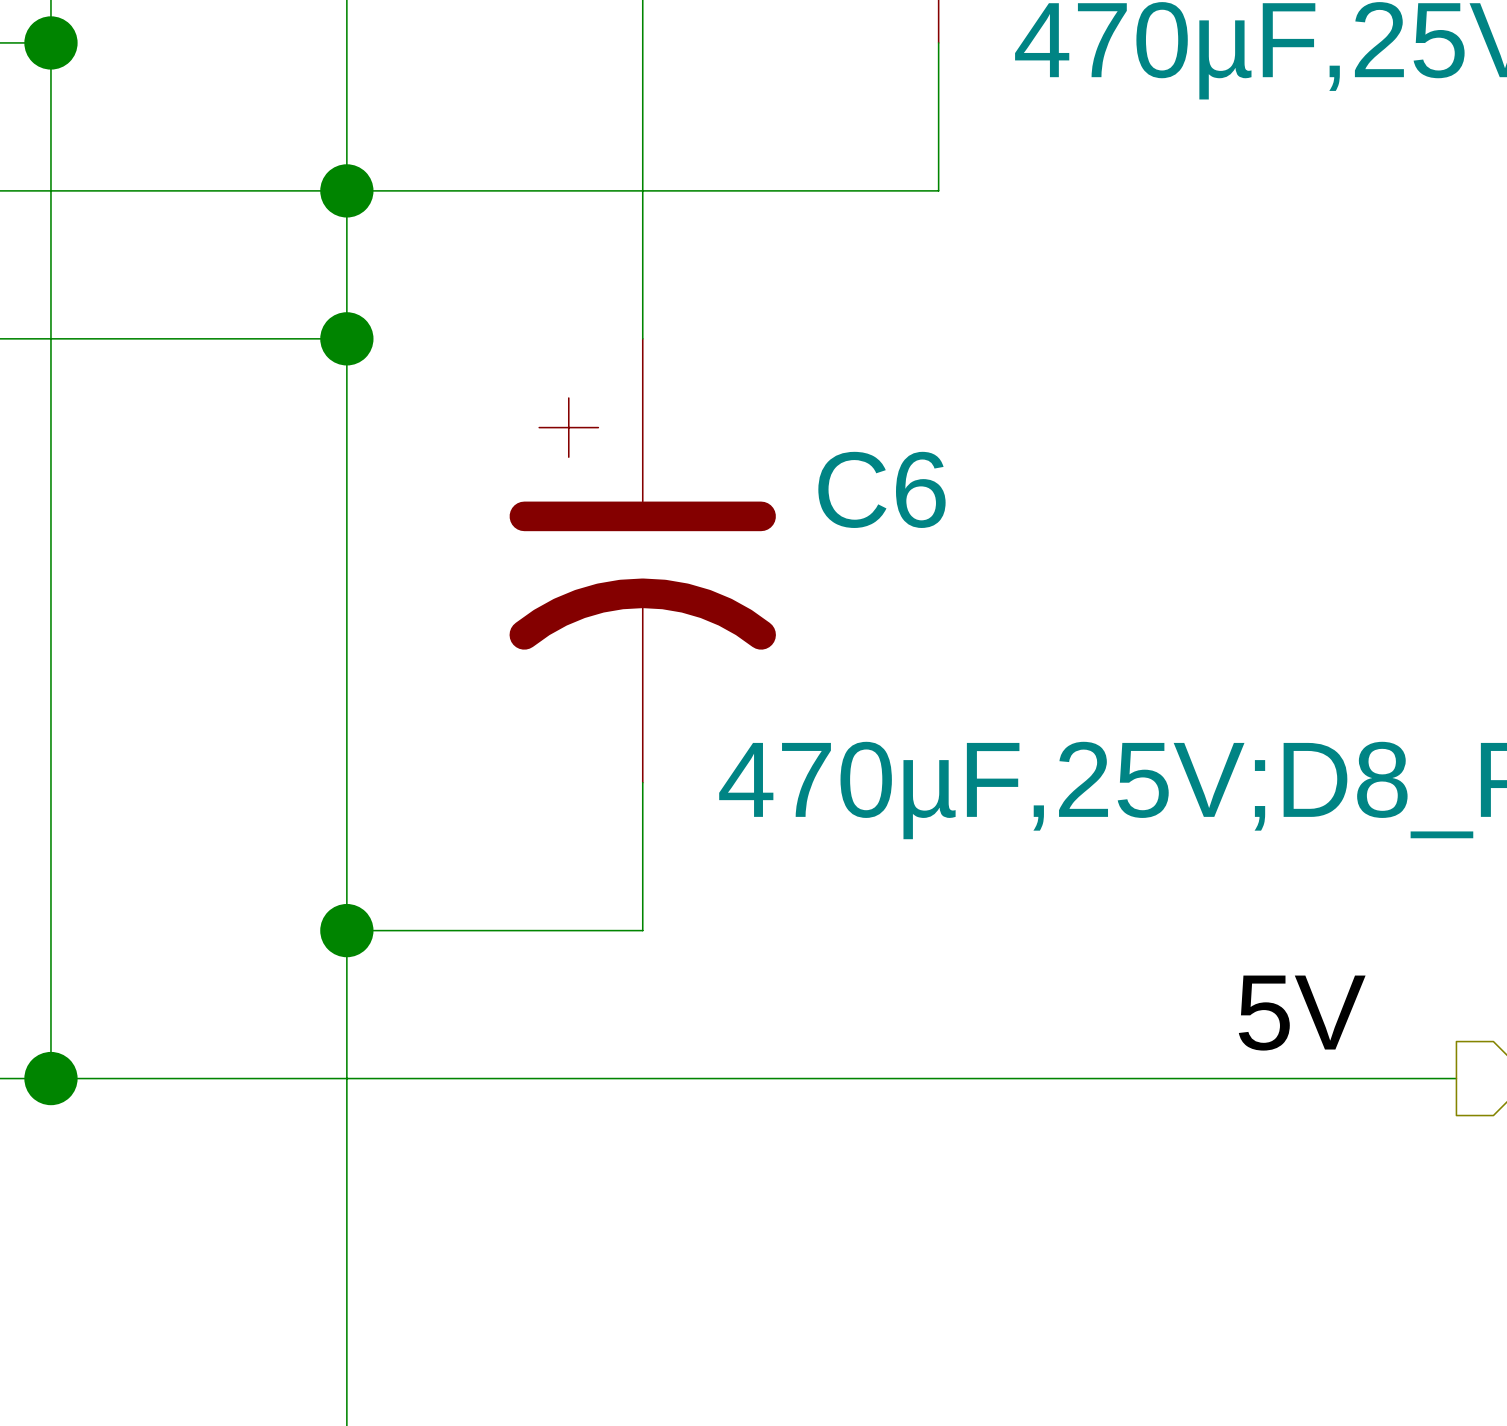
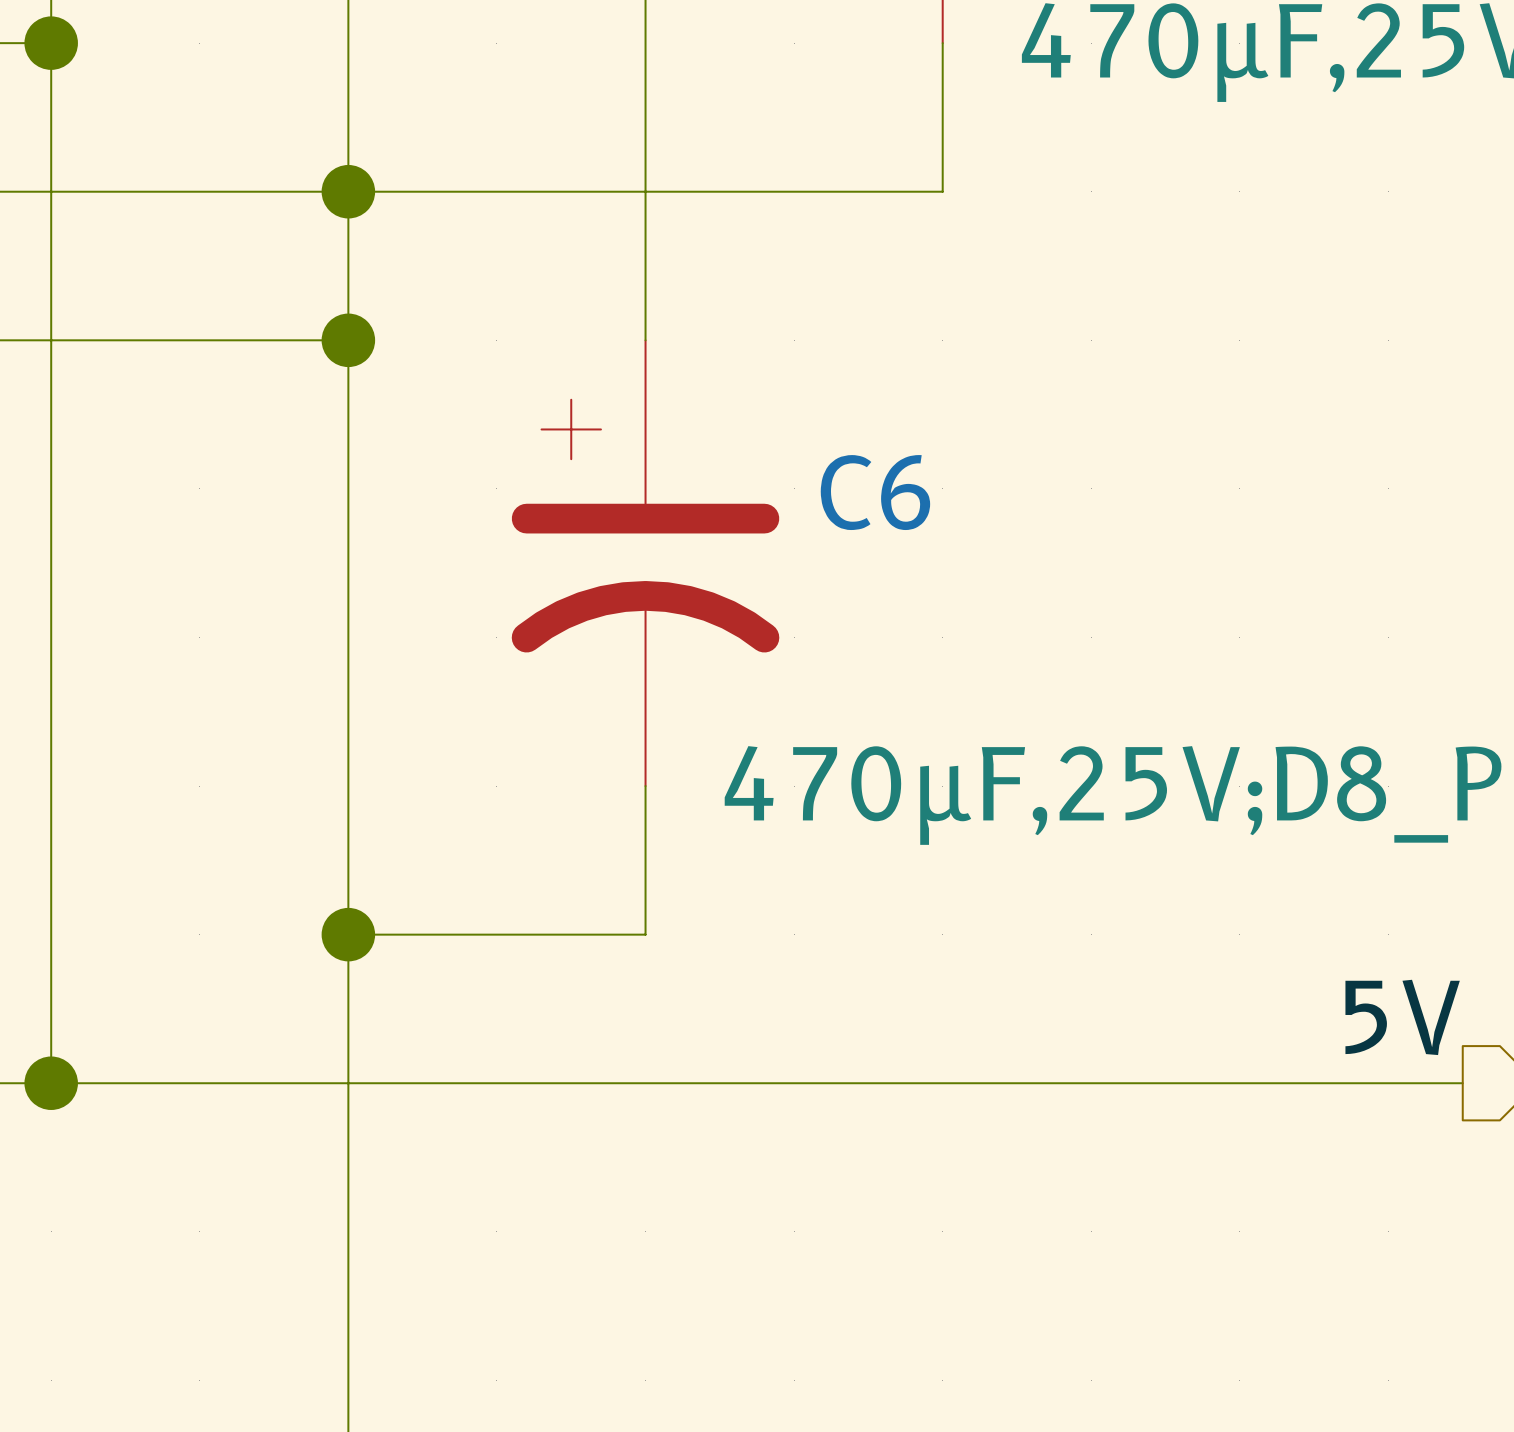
label position: 5V (1302, 1013) -> 5V (1402, 1017)

